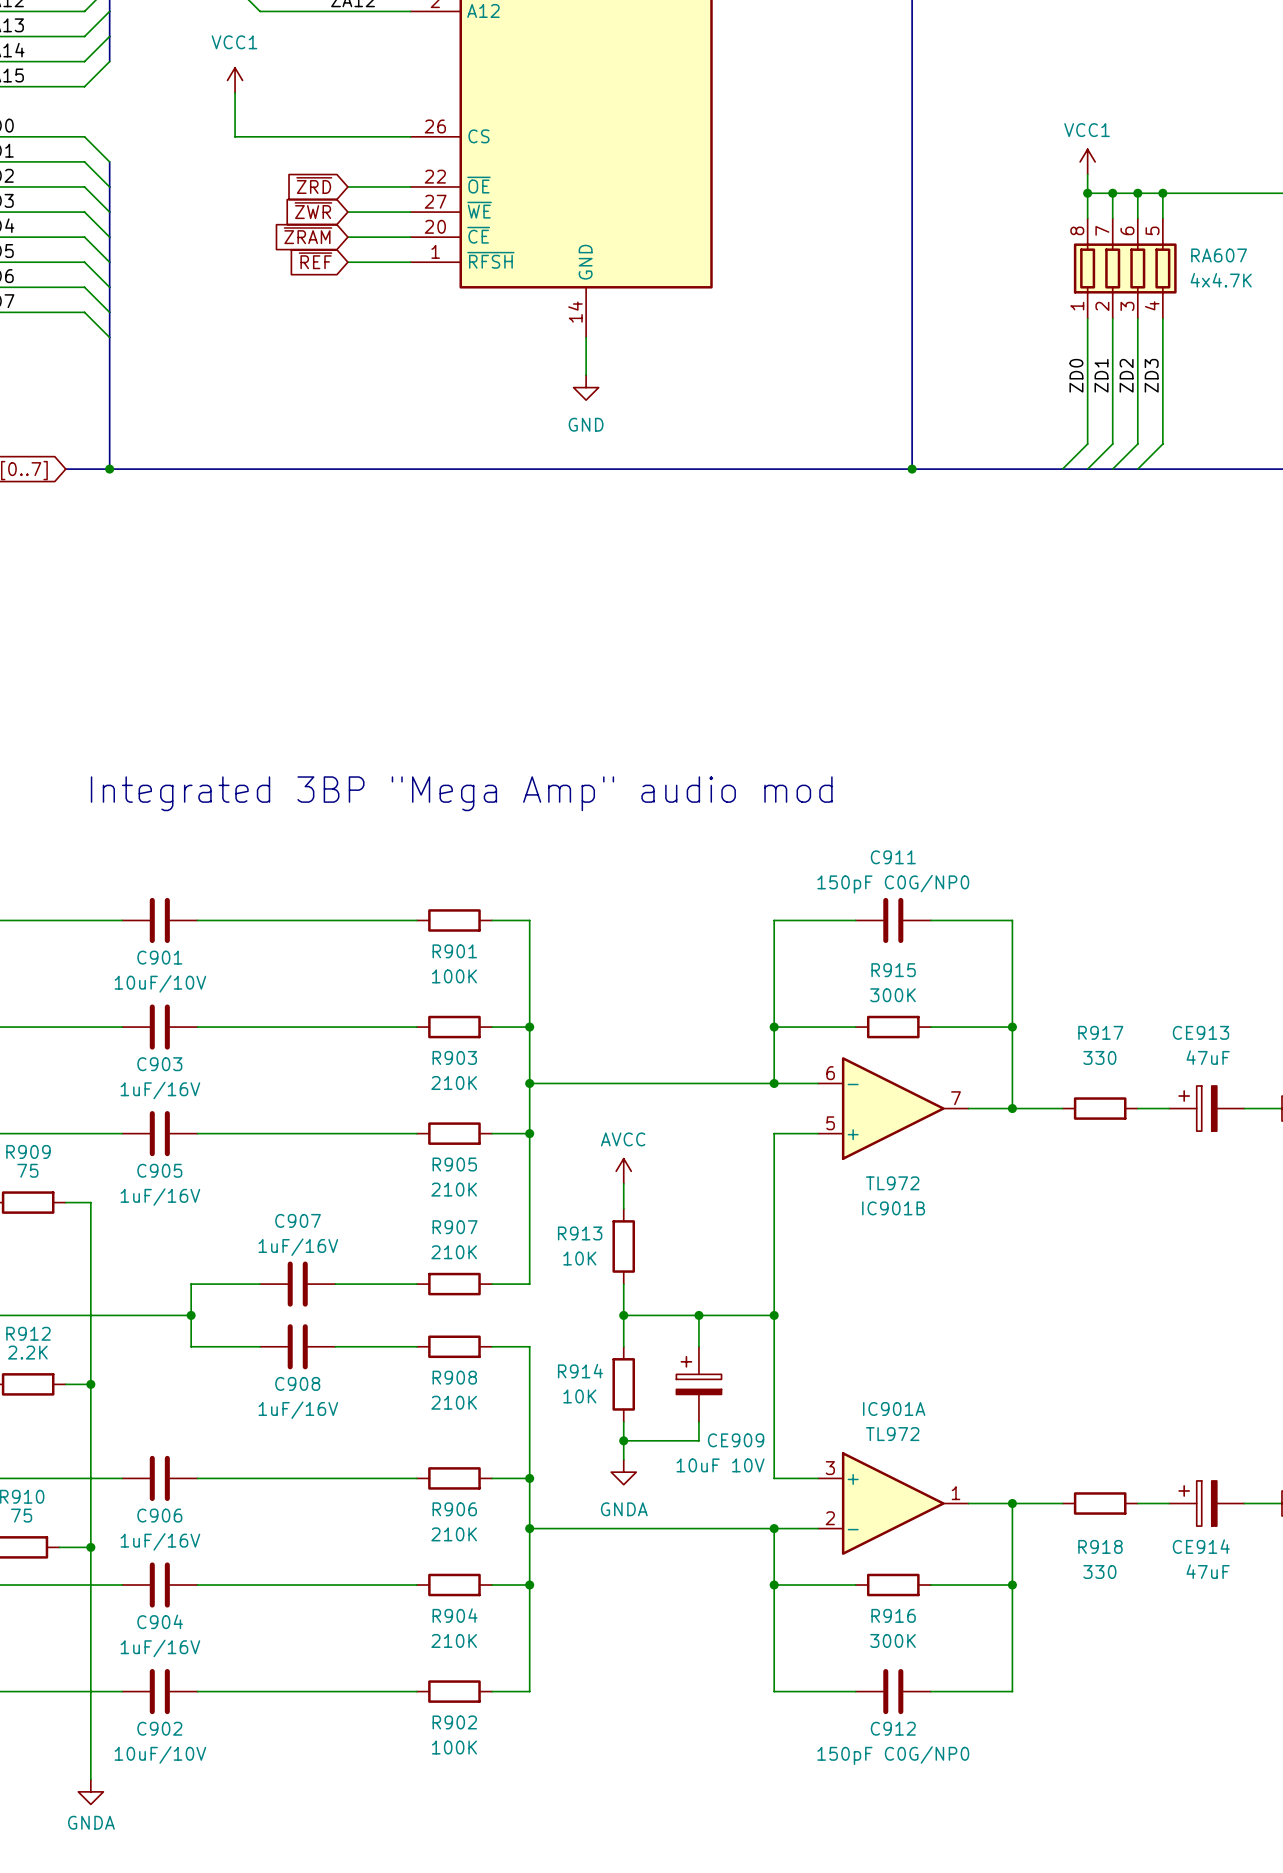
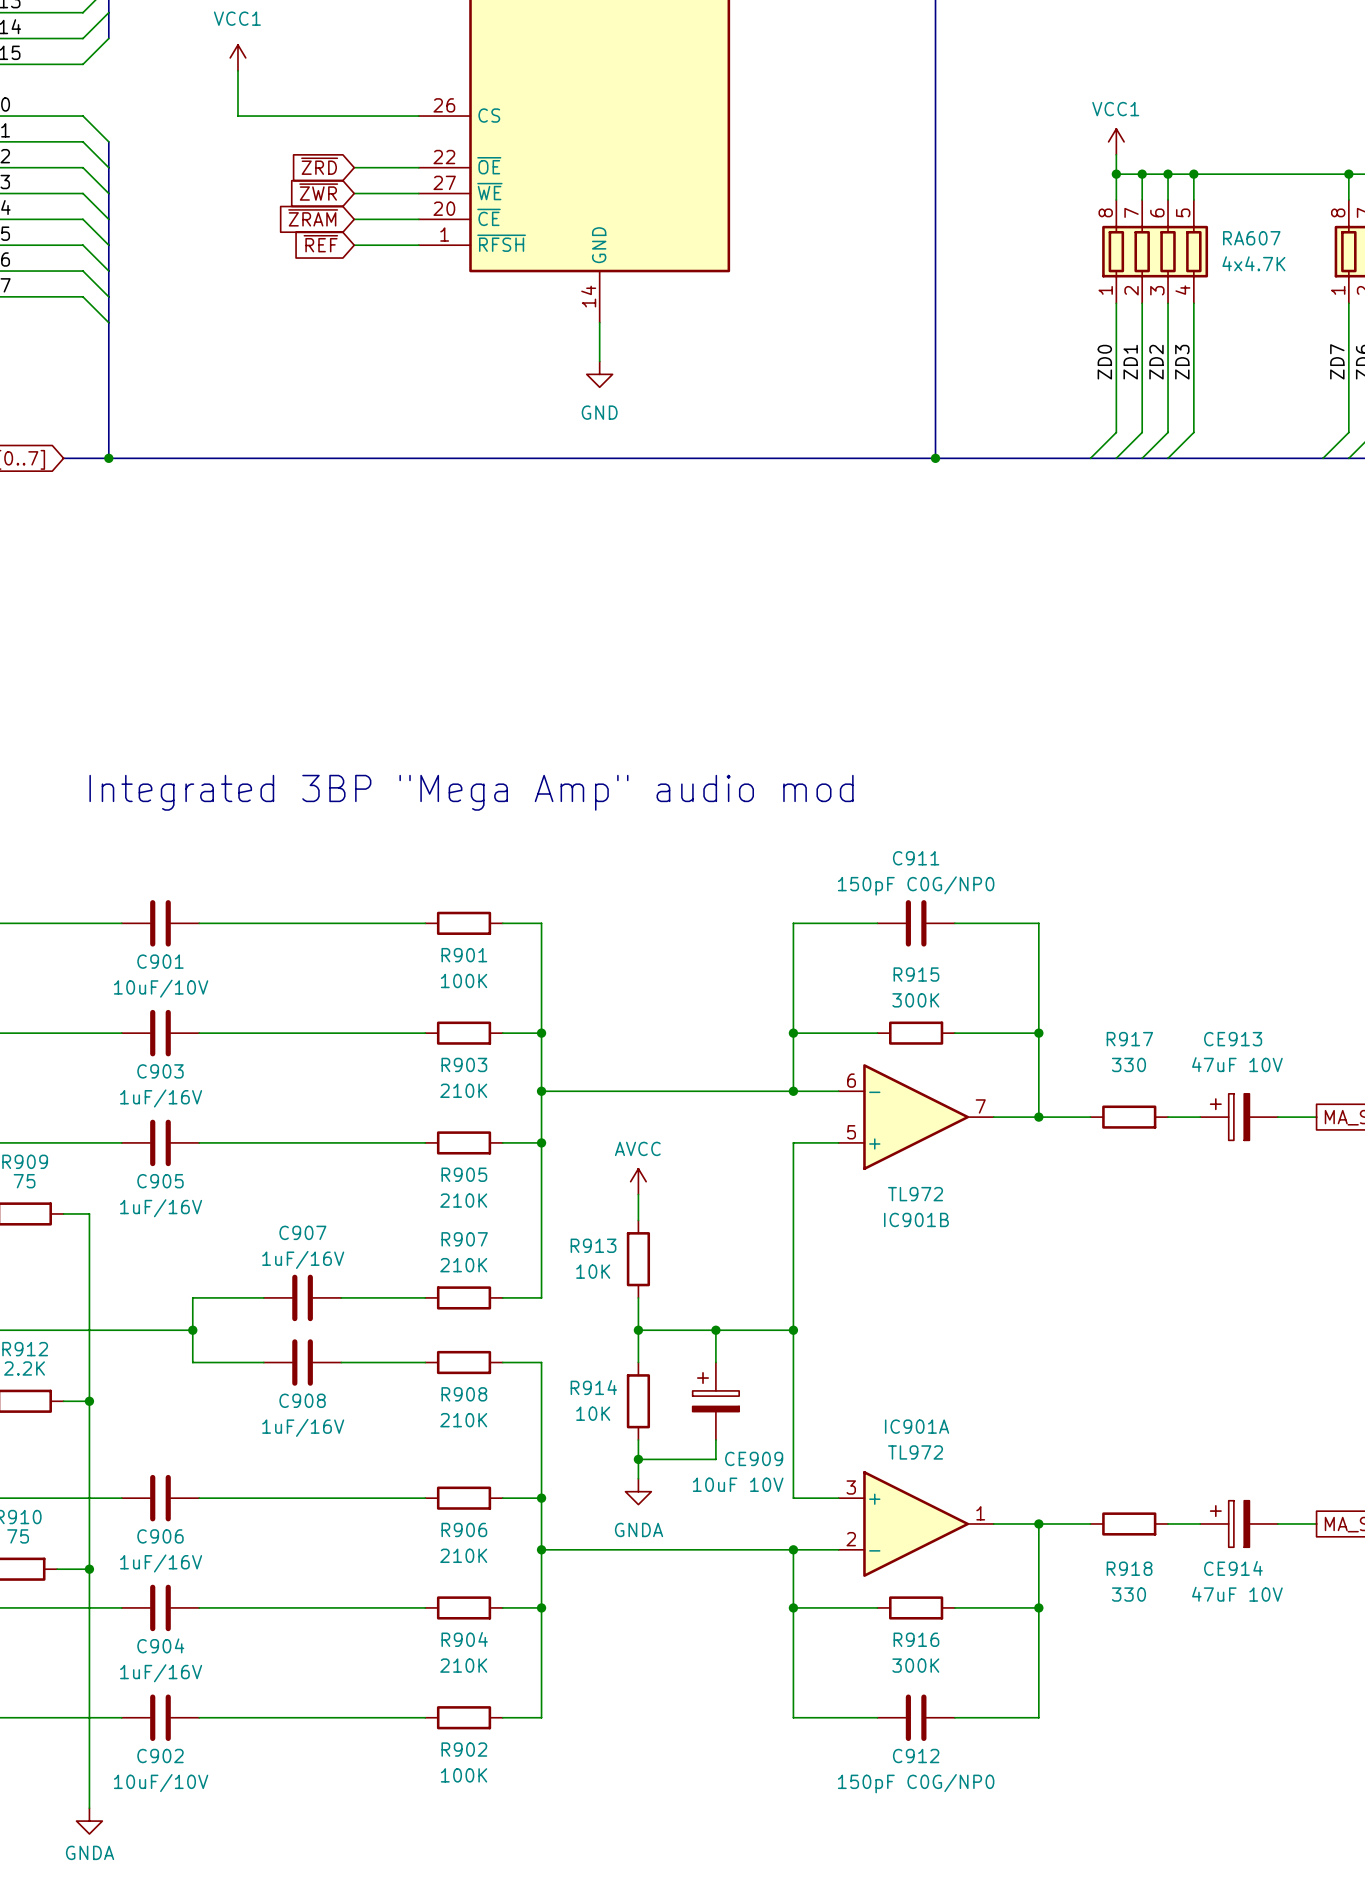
CE913 value: 47uF (1208, 1057) -> 47uF 10V (1237, 1064)
CE914 value: 47uF (1208, 1571) -> 47uF 10V (1237, 1594)

